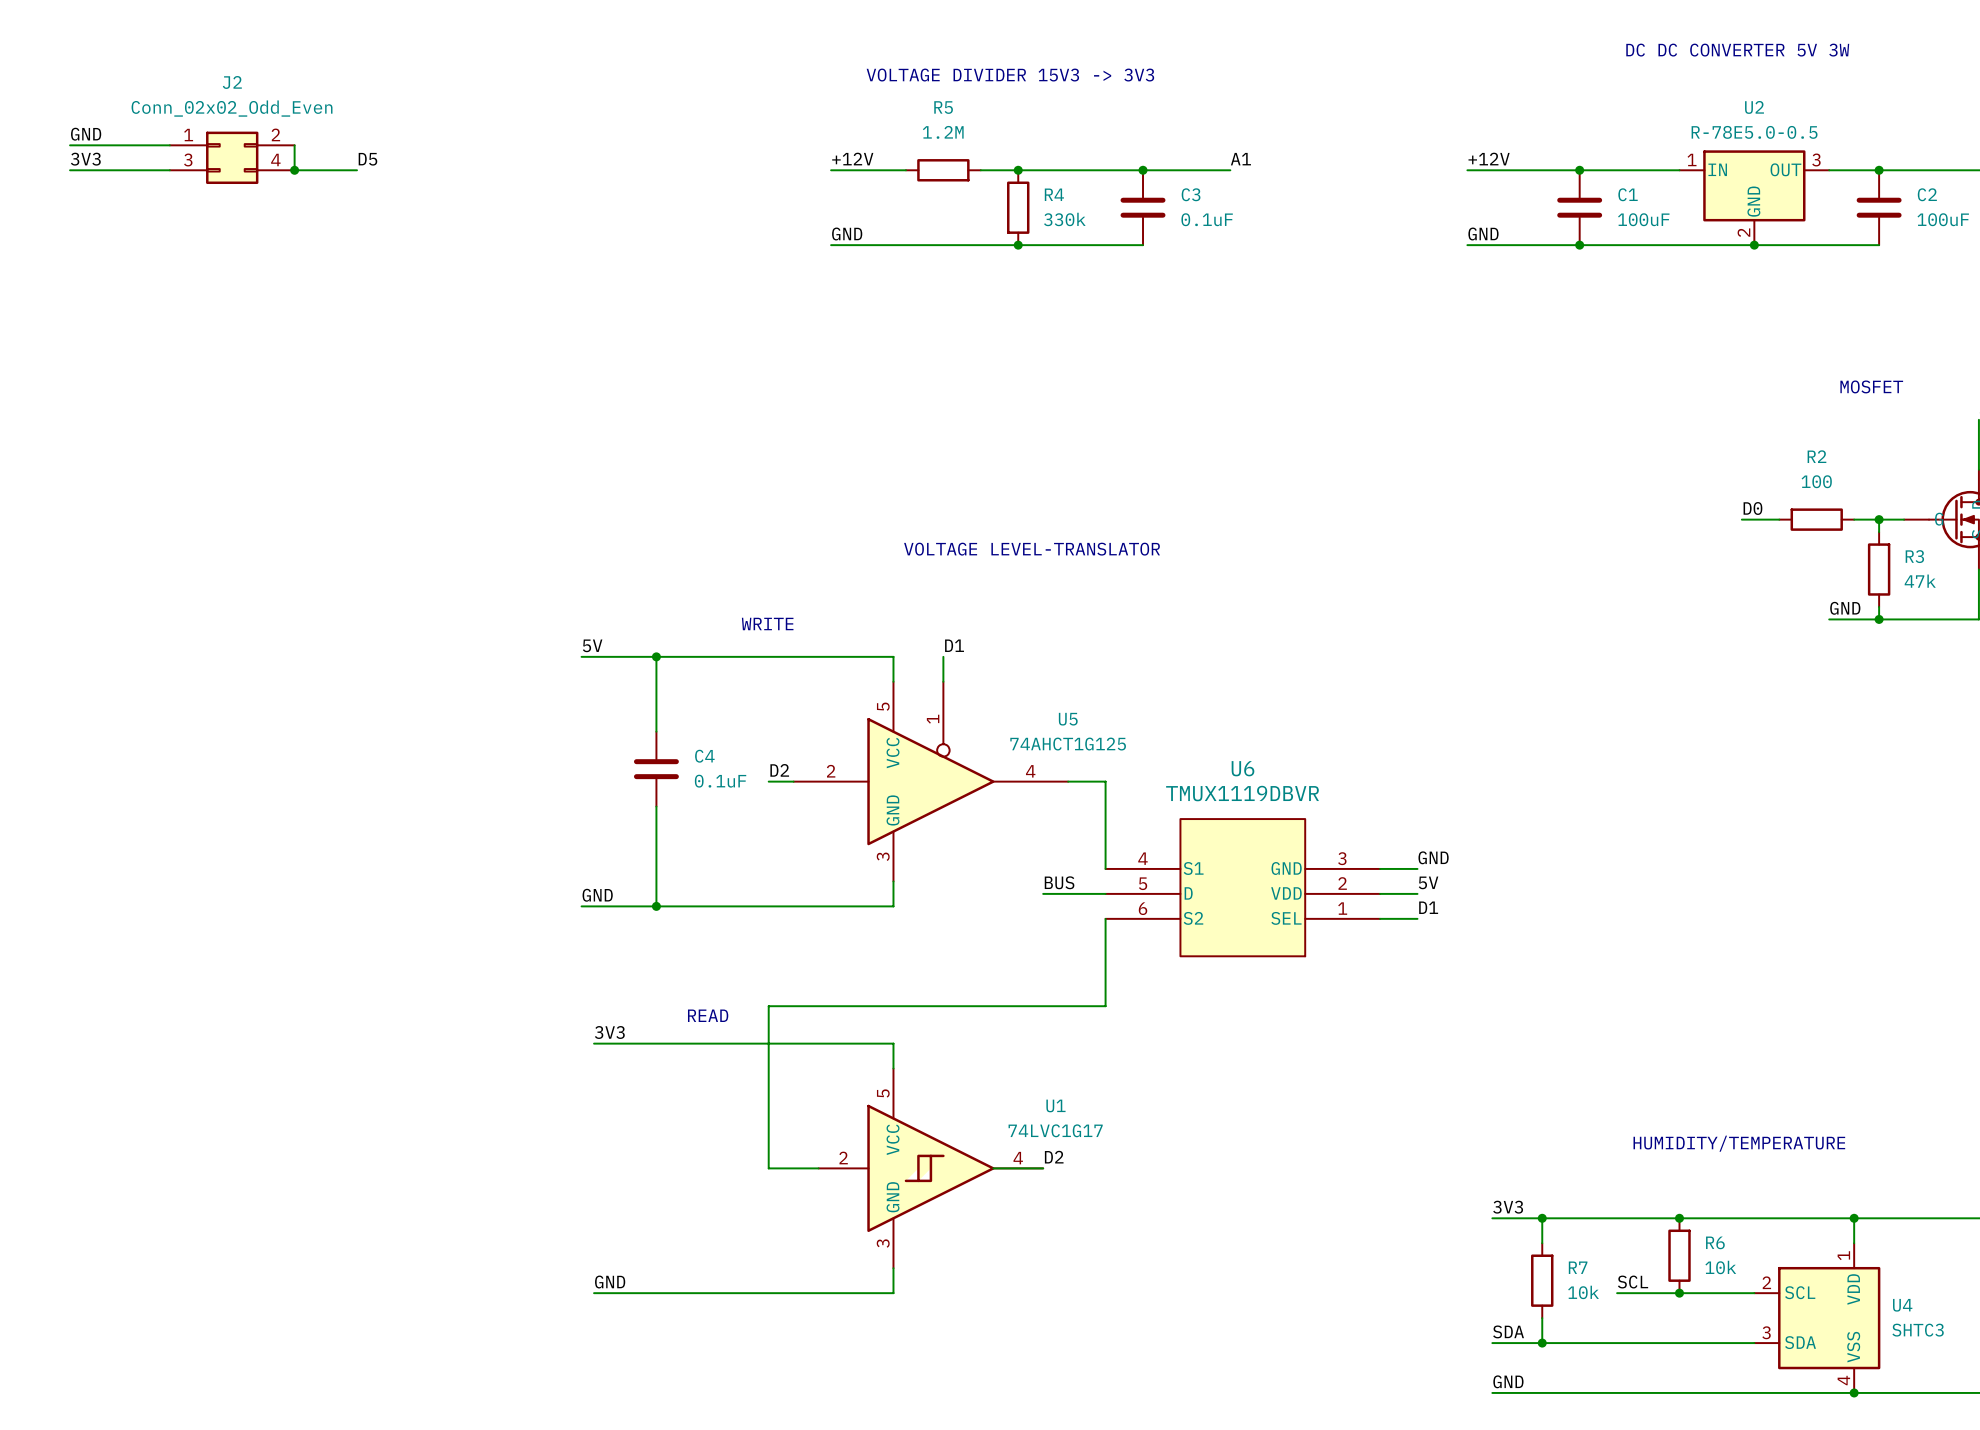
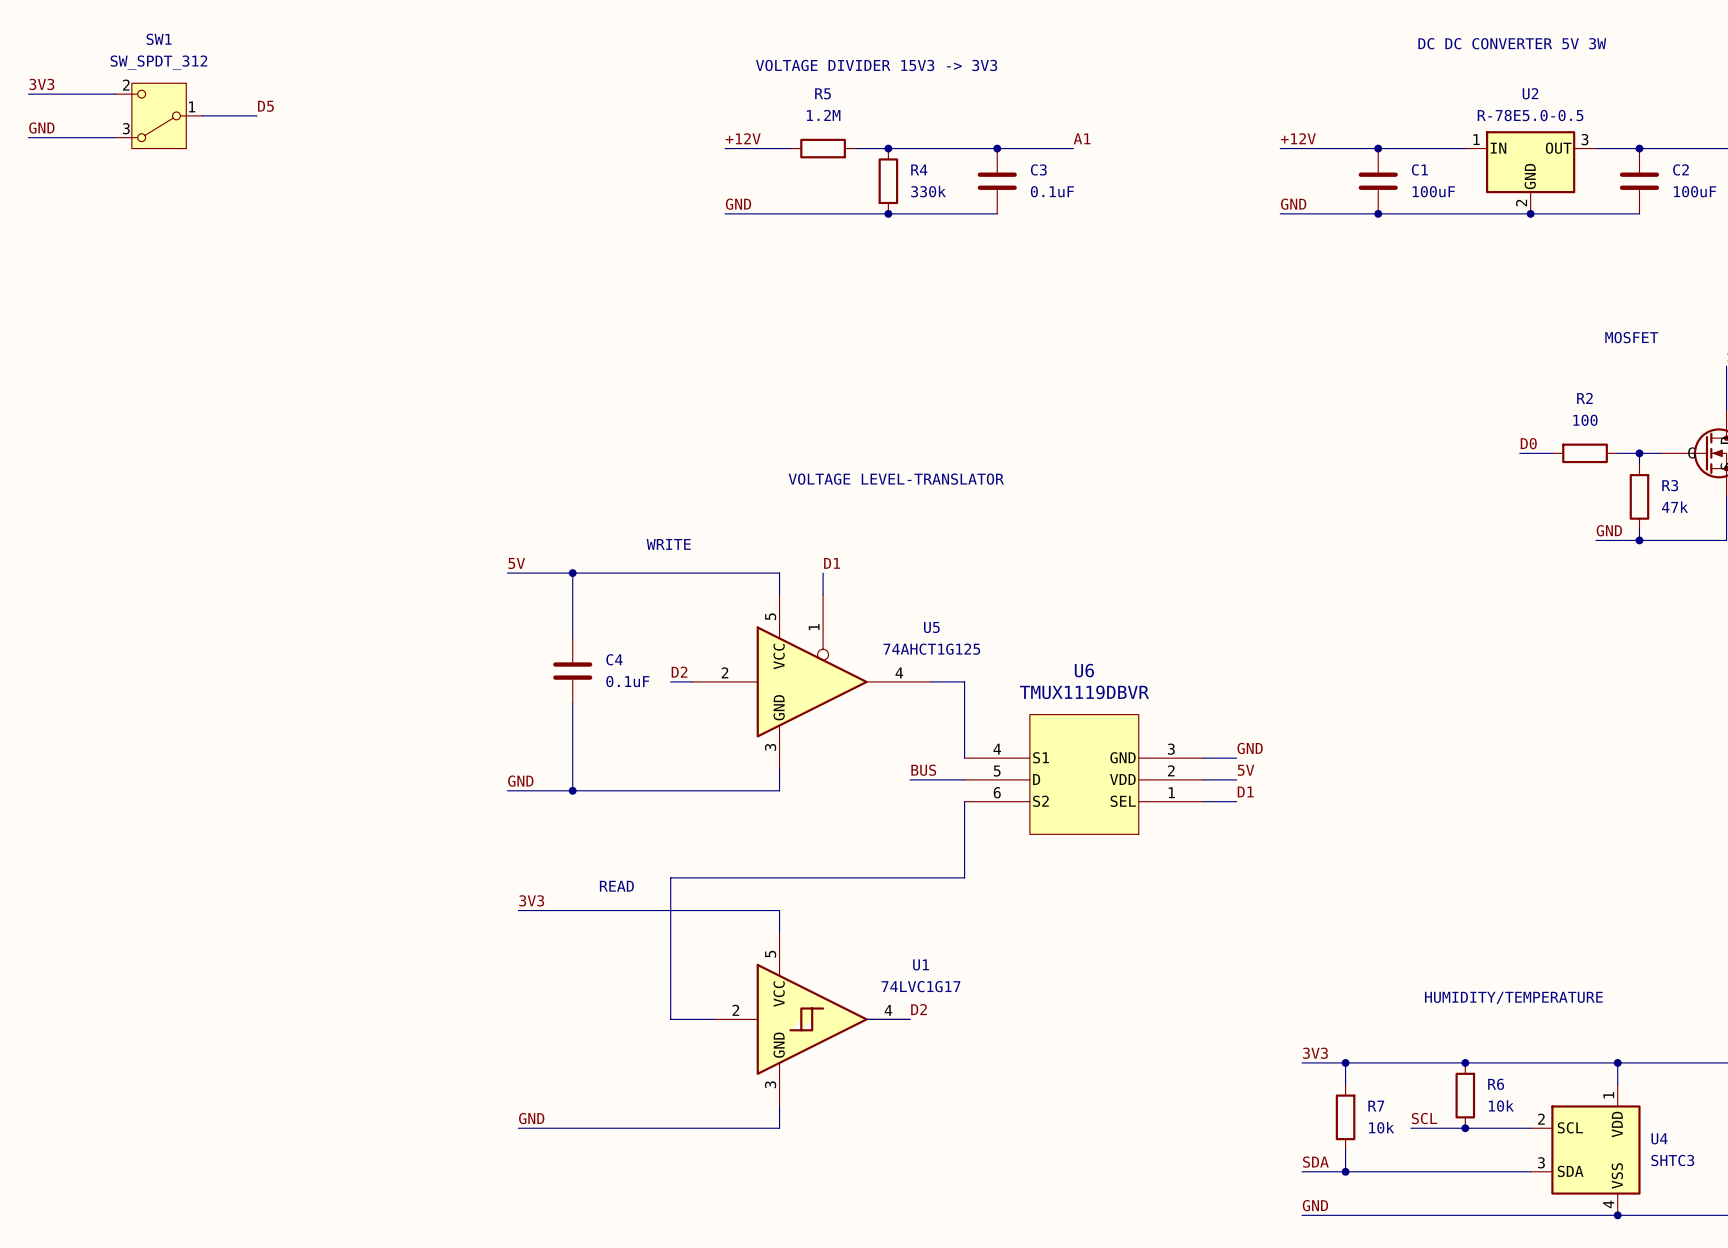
SW1: none -> SW_SPDT_312 (159, 115)
wire: none -> (202, 115) (257, 115)
label position: GND (86, 134) -> GND (41, 127)
wire: (70, 145) (169, 145) -> (28, 137) (115, 137)
wire: (294, 145) (294, 170) (356, 170) -> none
J2: Conn_02x02_Odd_Even (232, 157) -> none
label position: 3V3 (85, 159) -> 3V3 (41, 84)
label position: D5 (367, 159) -> D5 (265, 106)
wire: (70, 170) (169, 170) -> (28, 94) (115, 94)
junction: (294, 170) -> none

